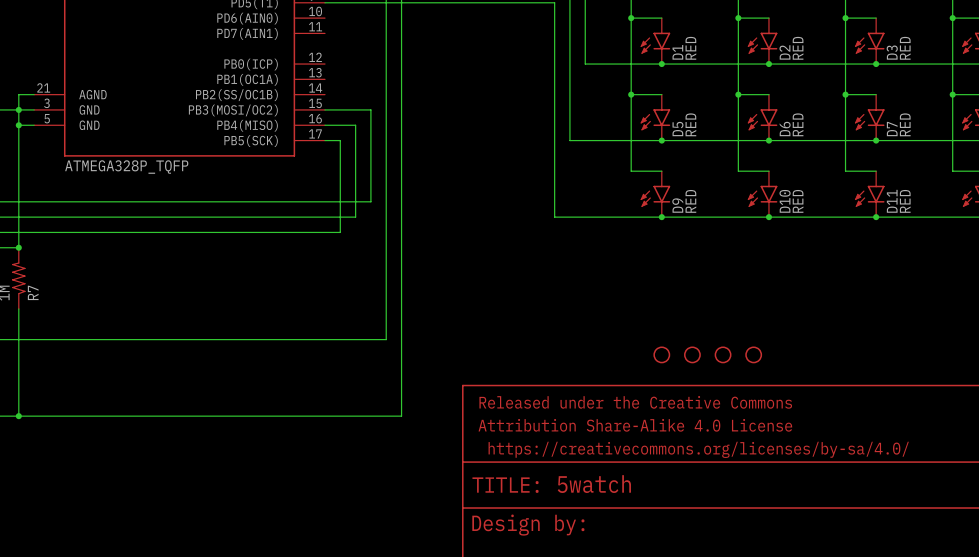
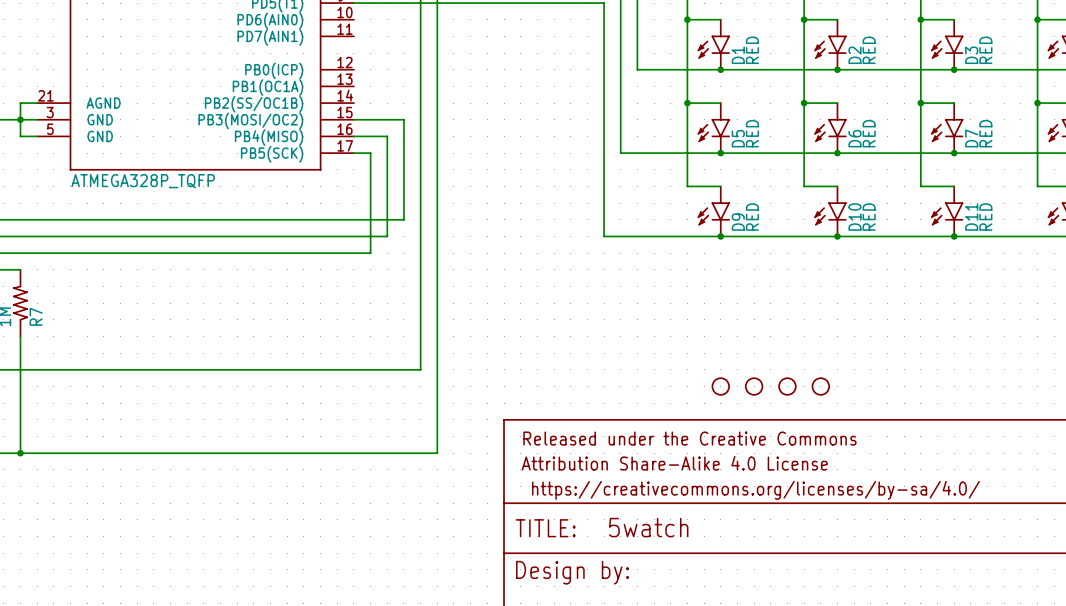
wire: (18, 125) (18, 247) -> none
junction: (18, 125) -> none
junction: (18, 247) -> none

